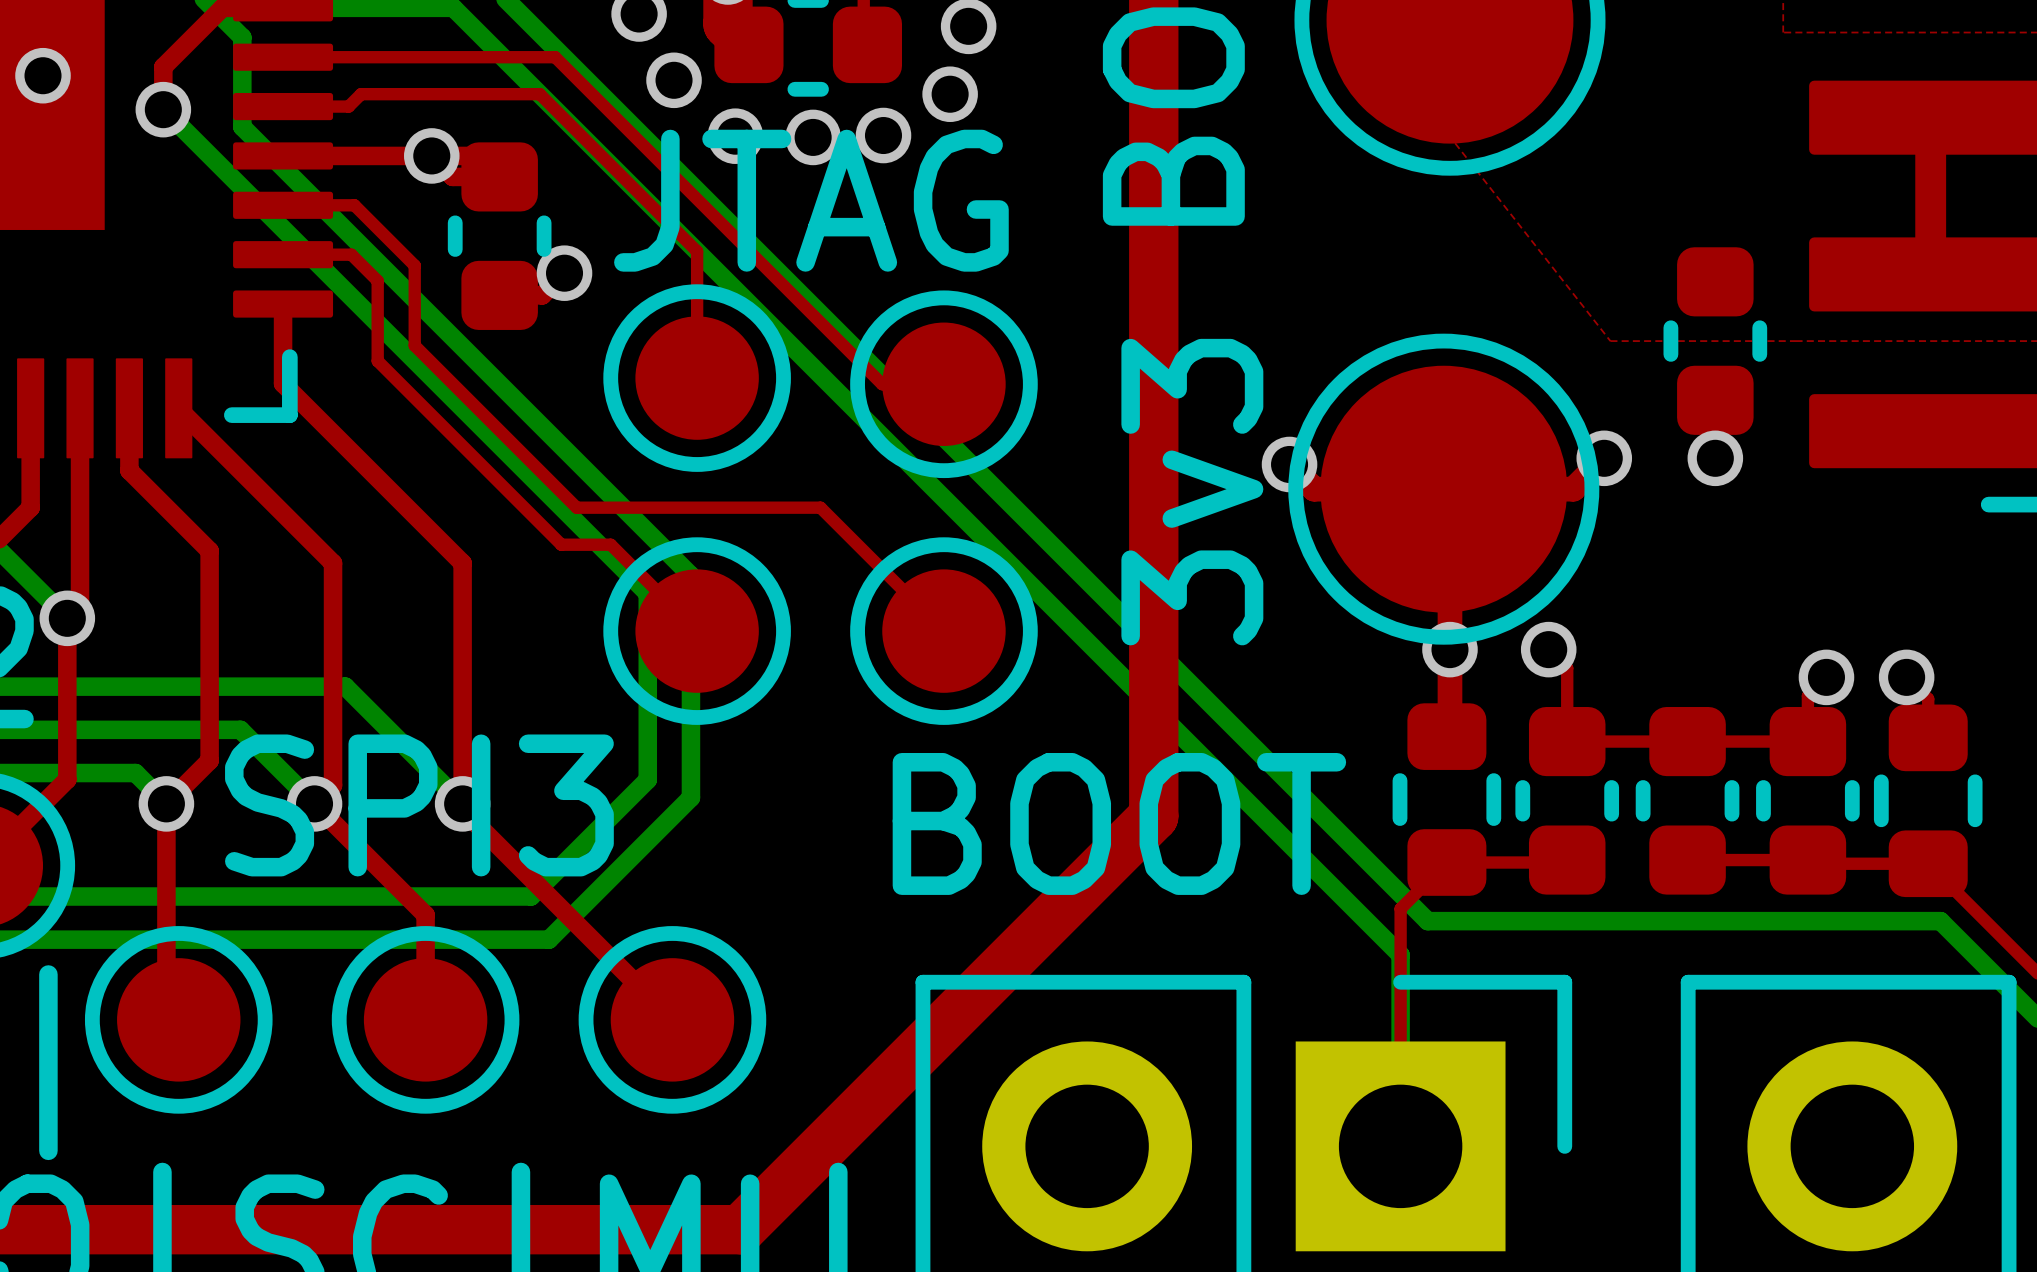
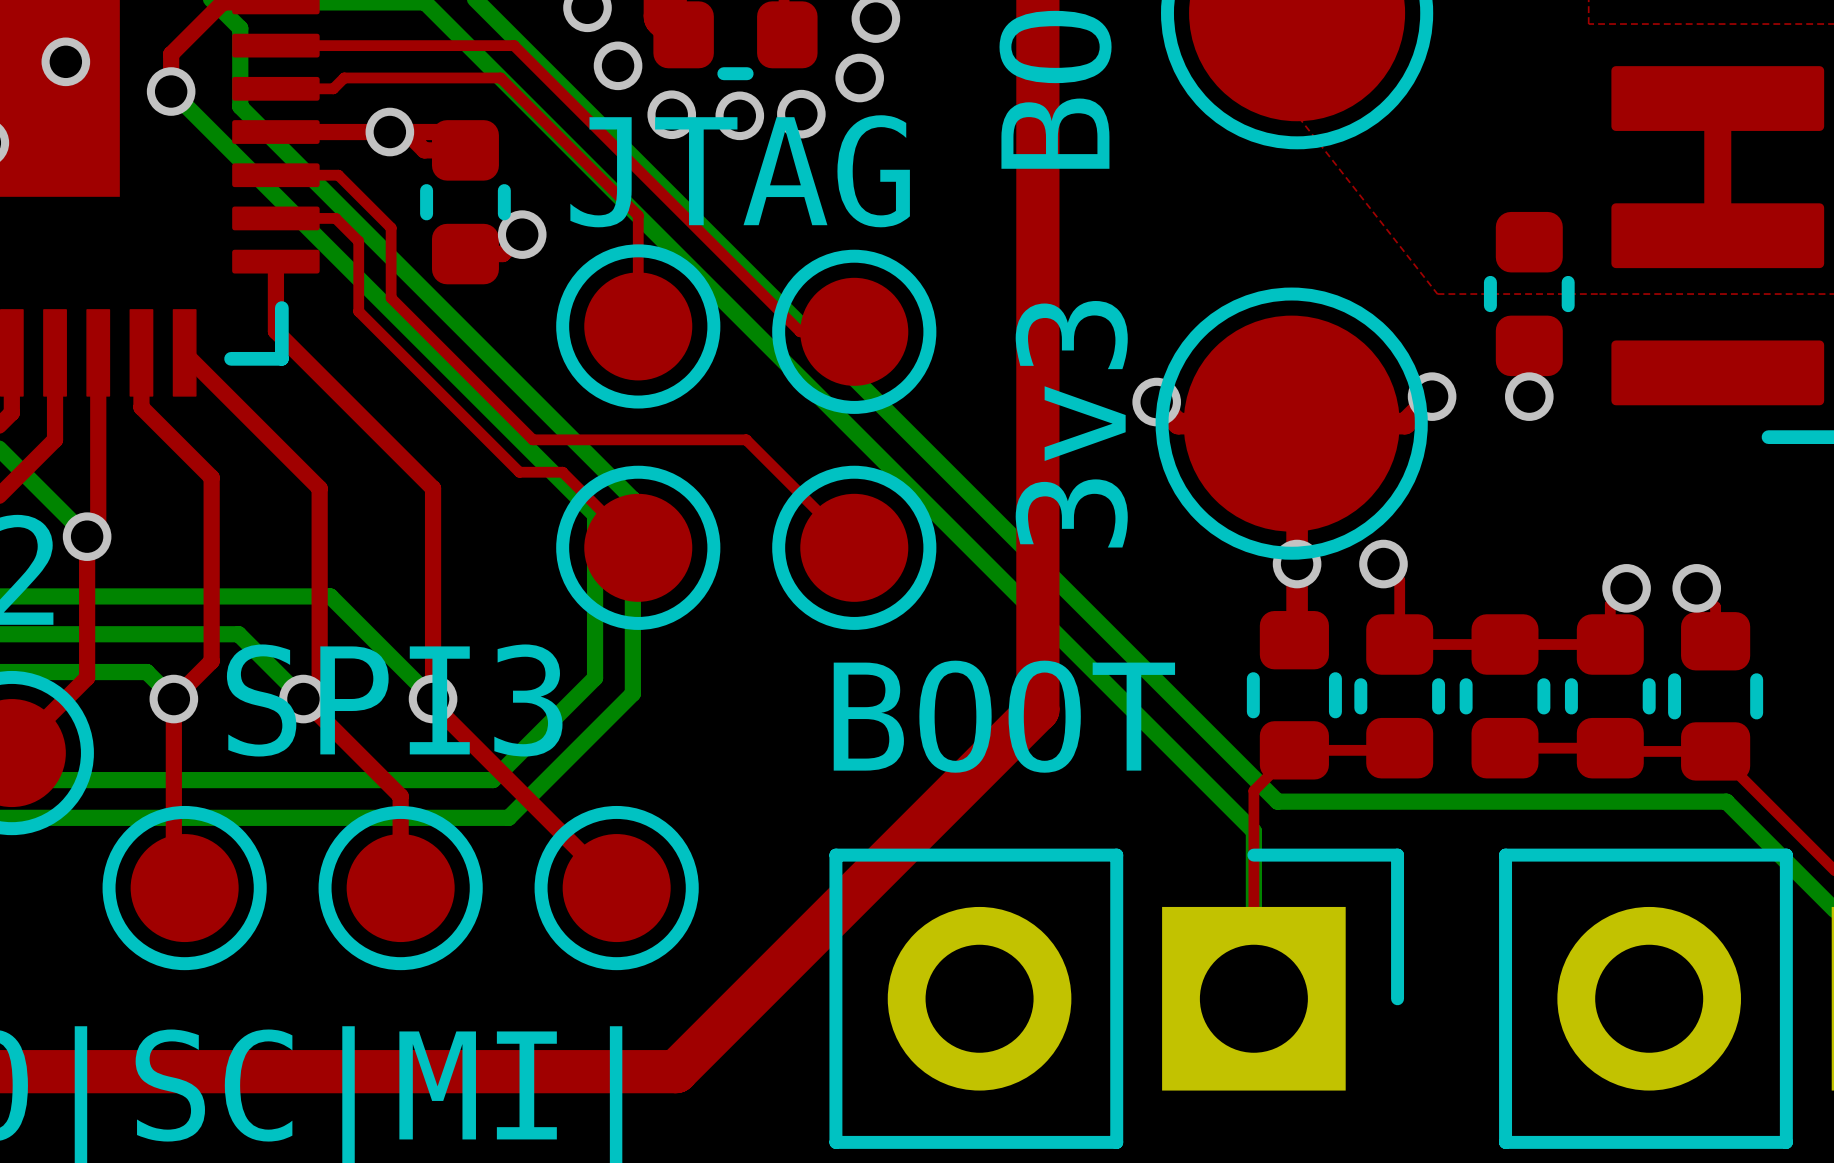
via position: (431, 155) -> (389, 132)

